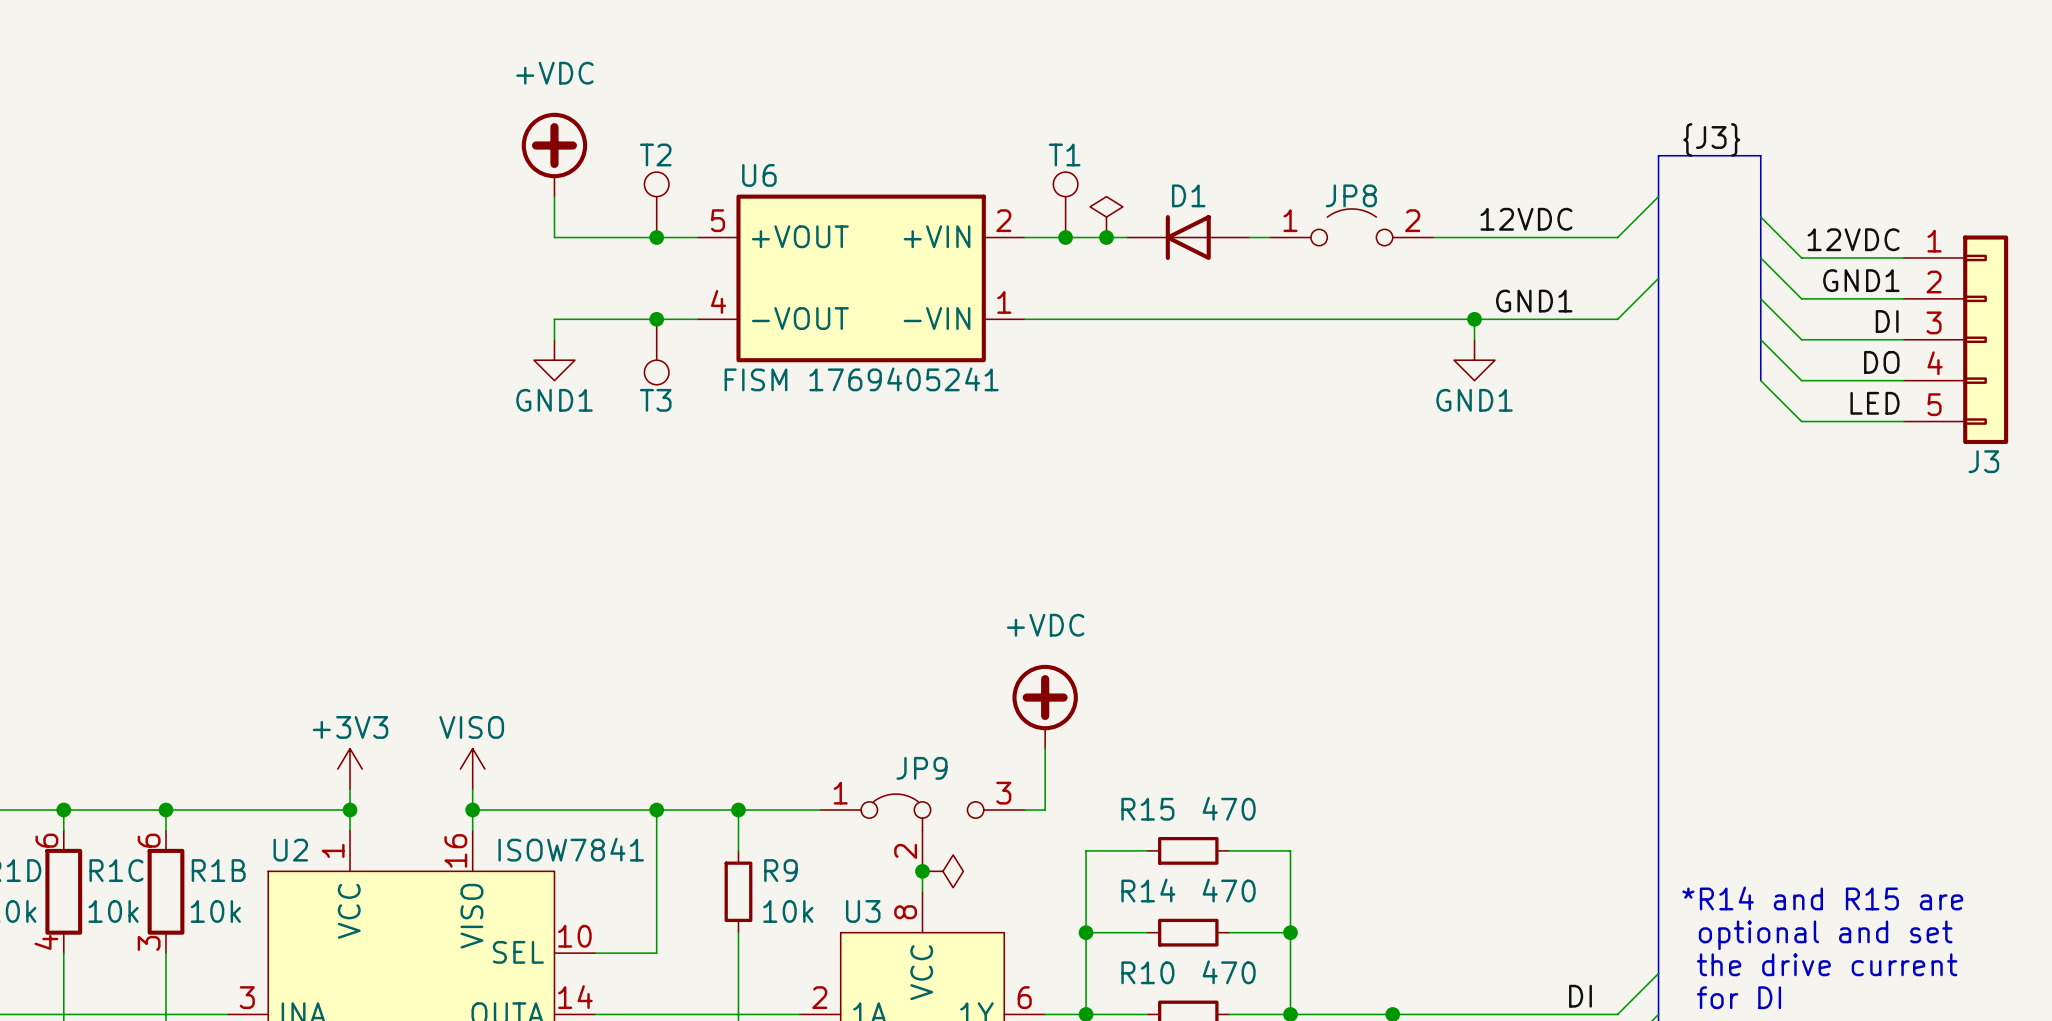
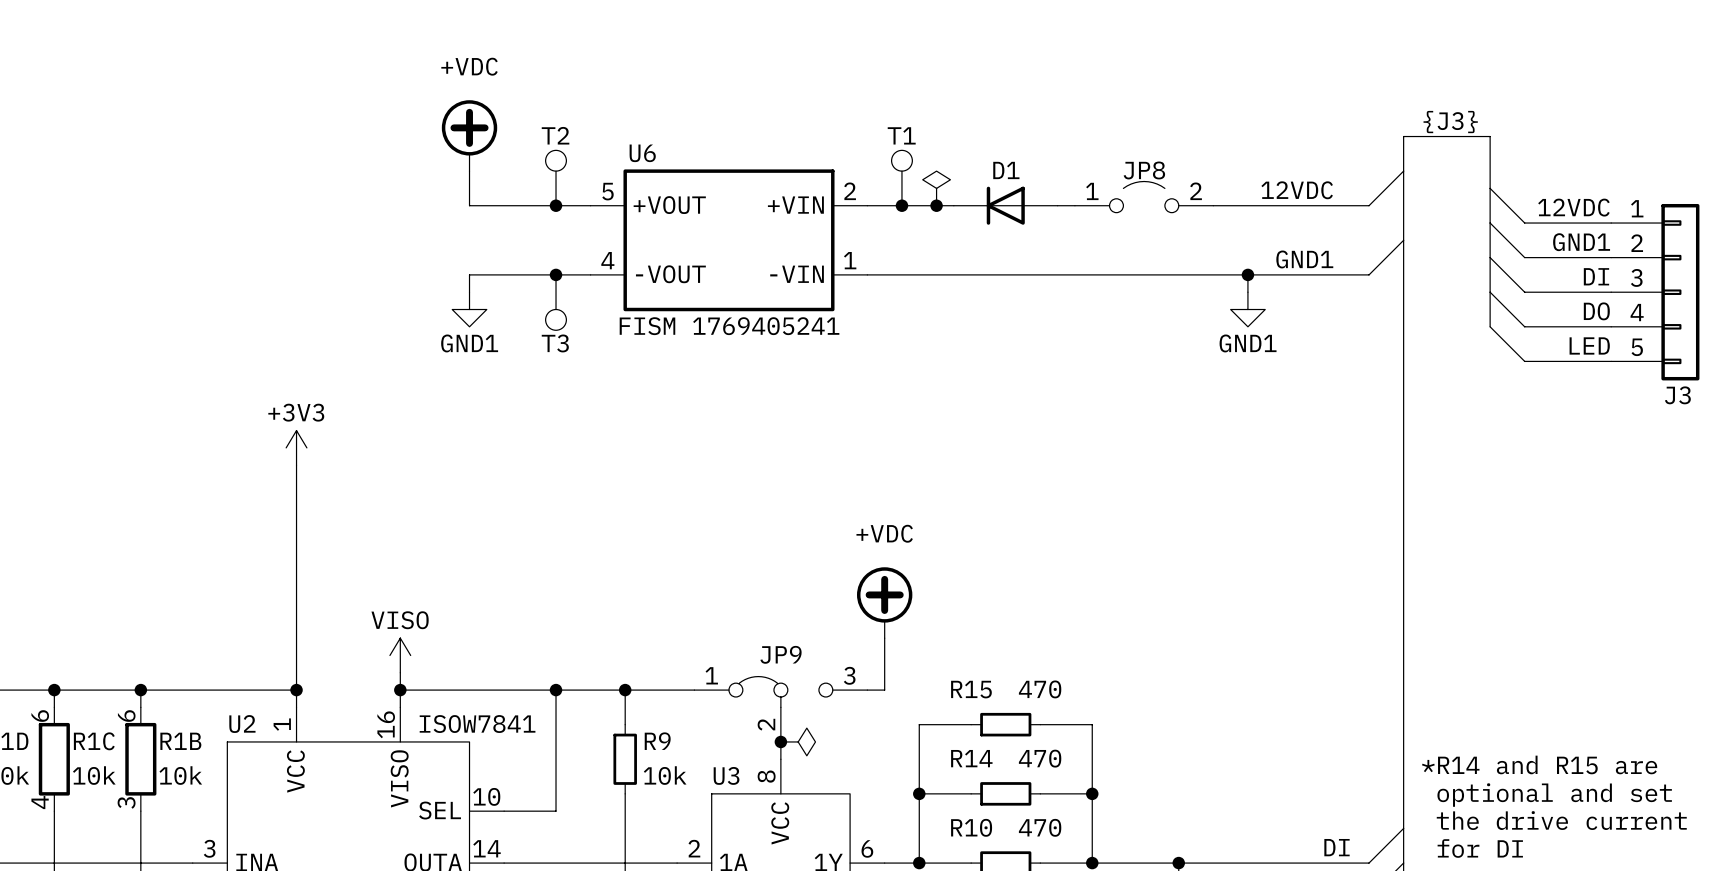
wire: none -> (296, 465) (296, 672)
power symbol position: +3V3 (350, 769) -> +3V3 (296, 447)

